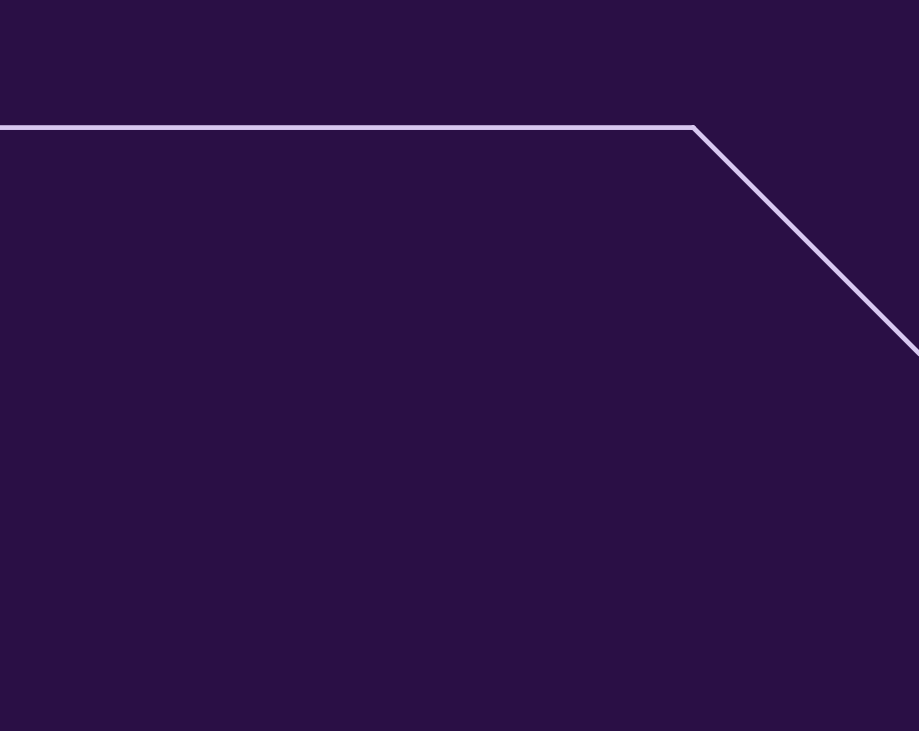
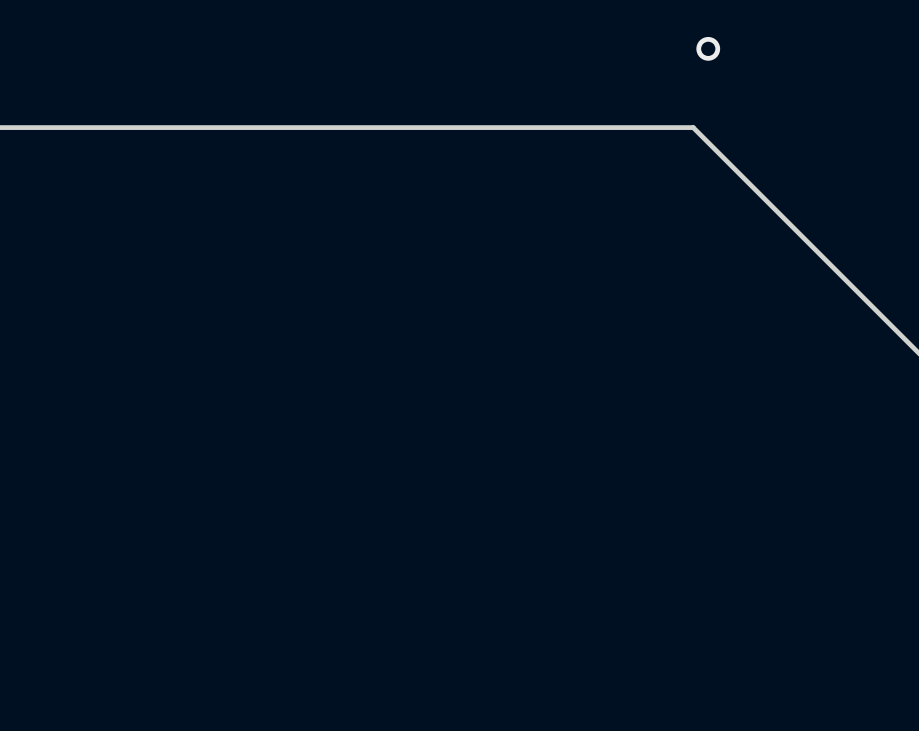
via: none -> (708, 48)

